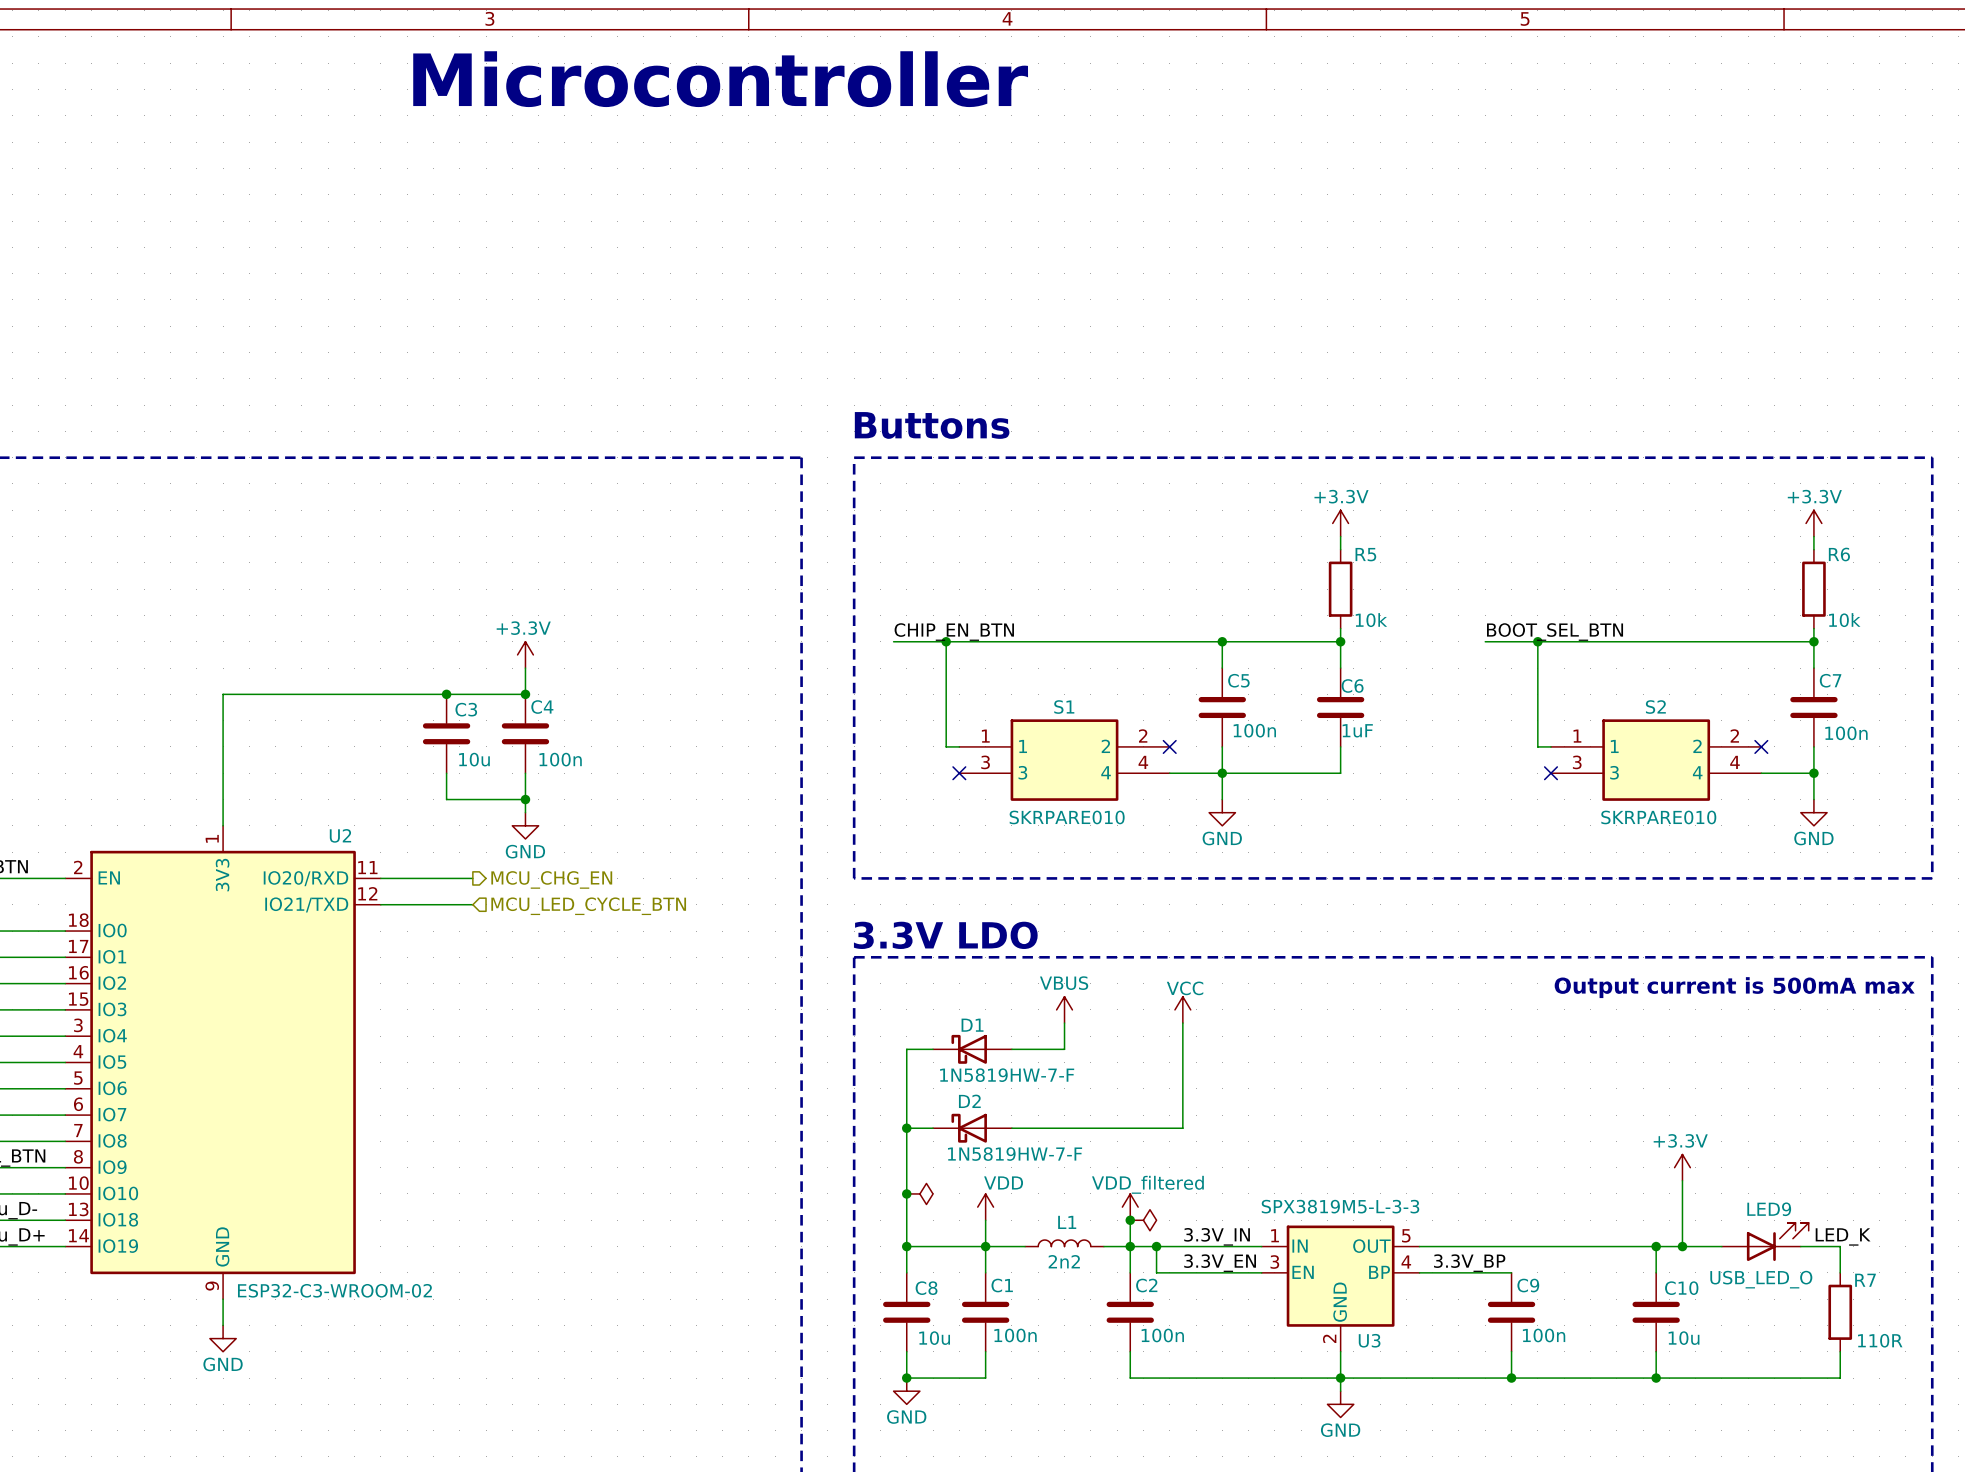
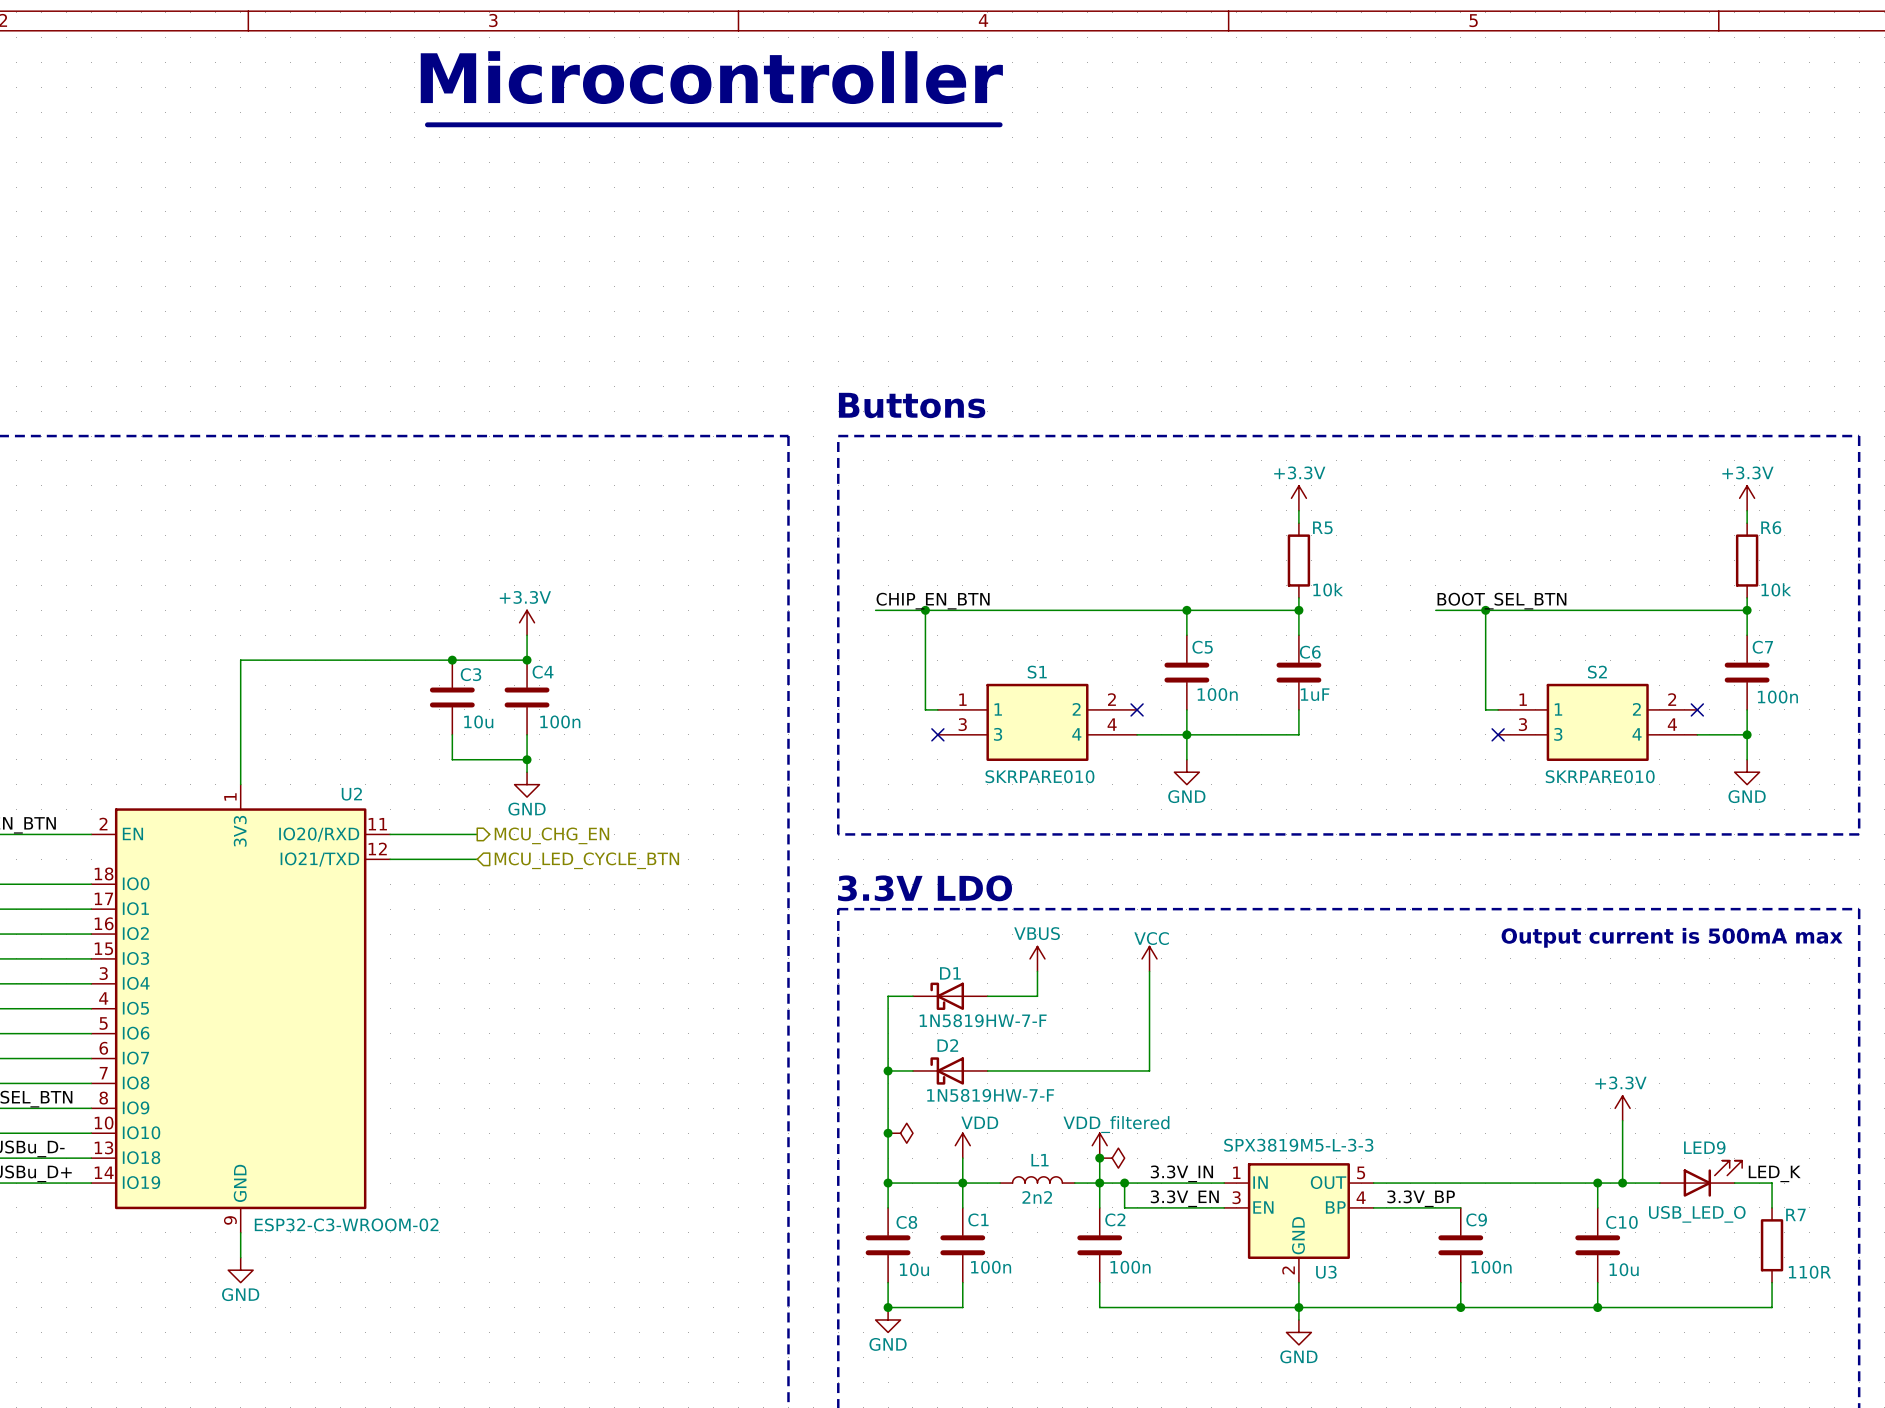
line: none -> (427, 124) (1000, 124)

